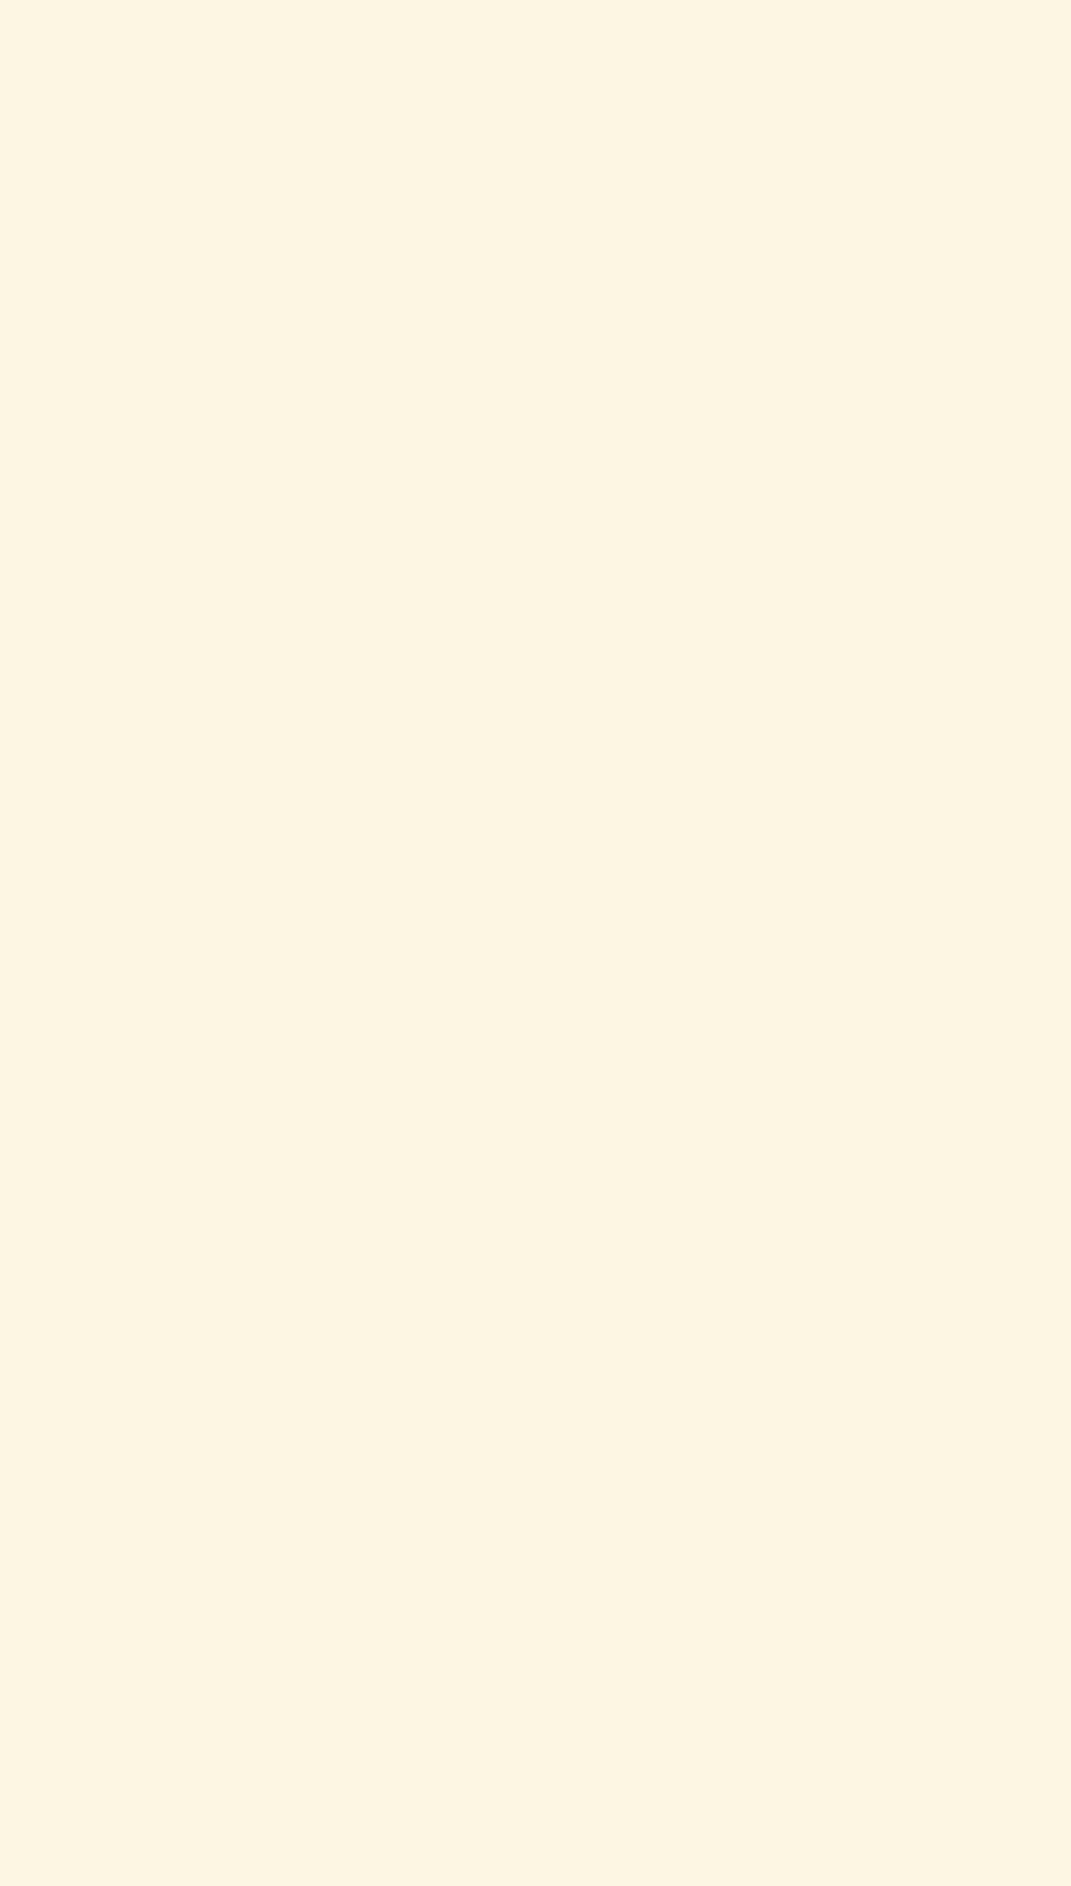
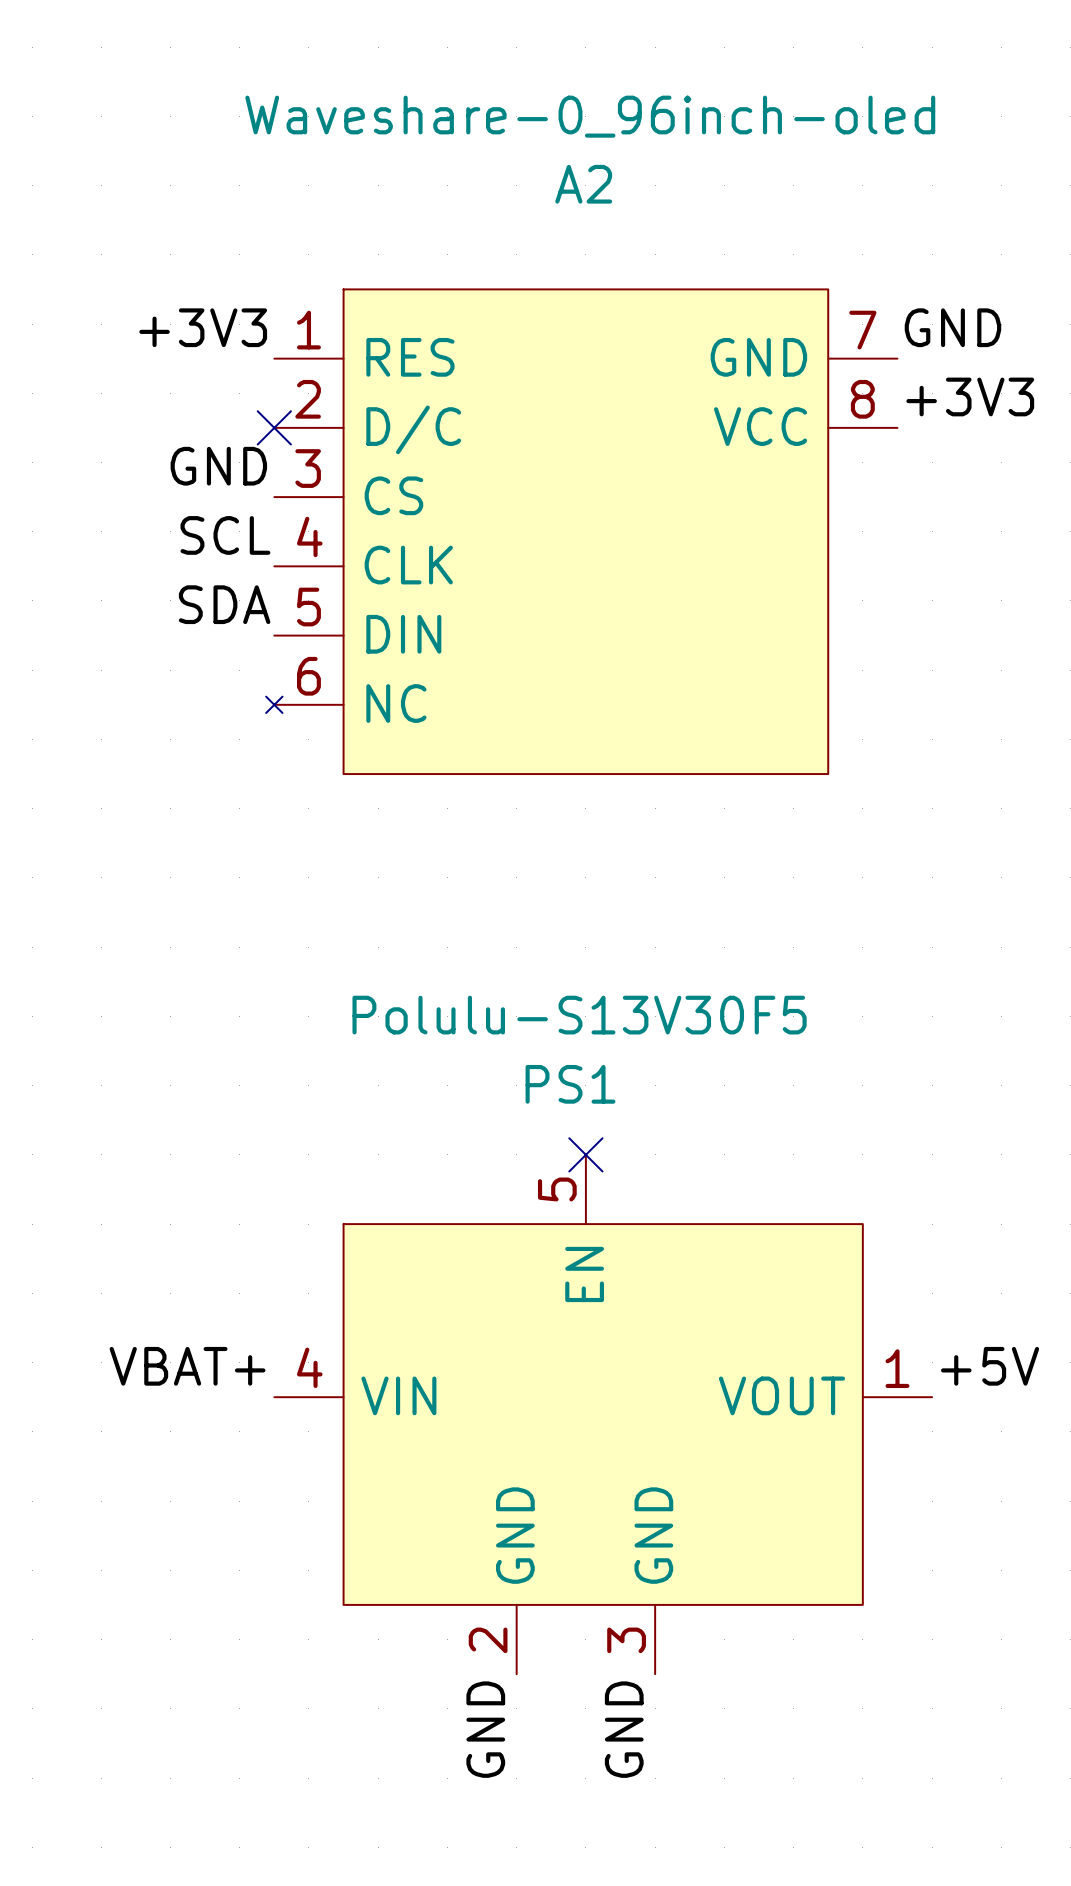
label: none -> +3V3 (203, 327)
label: none -> GND (952, 327)
label: none -> +3V3 (970, 396)
no-connect mark: none -> (274, 427)
label: none -> GND (218, 466)
A2: none -> Waveshare-0_96inch-oled (581, 531)
label: none -> SCL (225, 535)
label: none -> SDA (224, 604)
no-connect mark: none -> (585, 1154)
label: none -> VBAT+ (187, 1366)
label: none -> +5V (990, 1366)
PS1: none -> Polulu-S13V30F5 (603, 1414)
label: none -> GND (485, 1729)
label: none -> GND (624, 1729)

